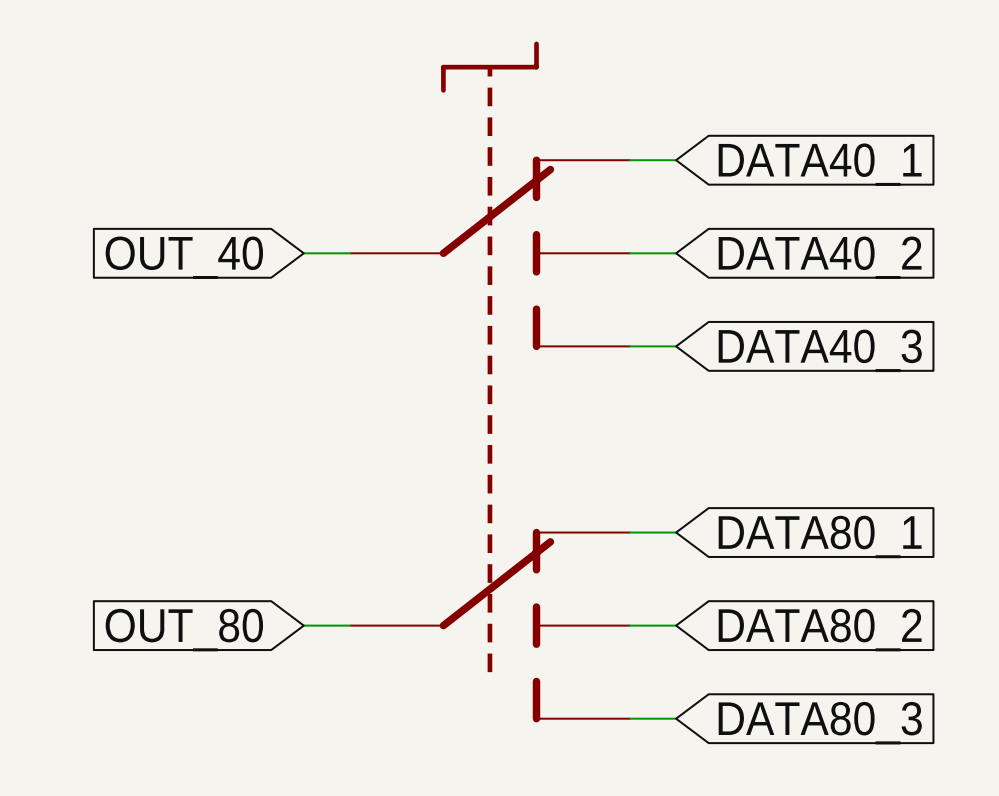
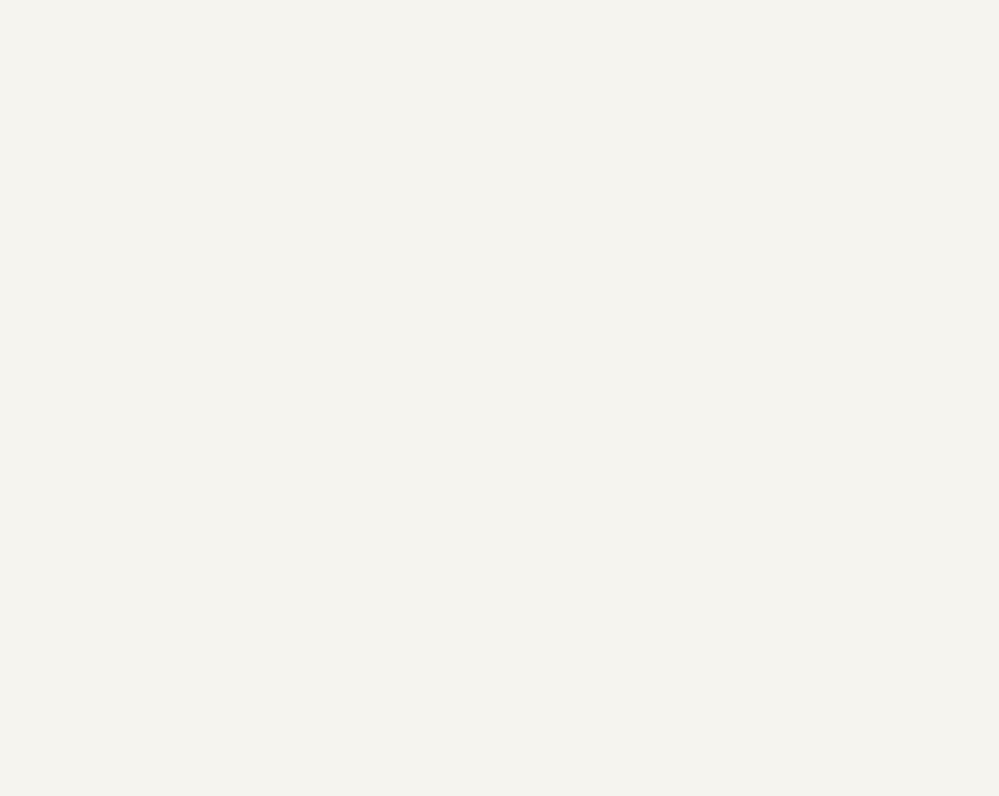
wire: (629, 160) (676, 160) -> none
global label: DATA40_1 (820, 164) -> none
wire: (303, 253) (350, 253) -> none
wire: (629, 253) (676, 253) -> none
global label: OUT_40 (184, 257) -> none
global label: DATA40_2 (820, 257) -> none
wire: (629, 346) (676, 346) -> none
global label: DATA40_3 (820, 350) -> none
part: (489, 381) -> none
wire: (629, 532) (676, 532) -> none
global label: DATA80_1 (820, 537) -> none
wire: (303, 625) (350, 625) -> none
wire: (629, 625) (676, 625) -> none
global label: OUT_80 (184, 630) -> none
global label: DATA80_2 (820, 630) -> none
wire: (629, 718) (676, 718) -> none
global label: DATA80_3 (820, 723) -> none

